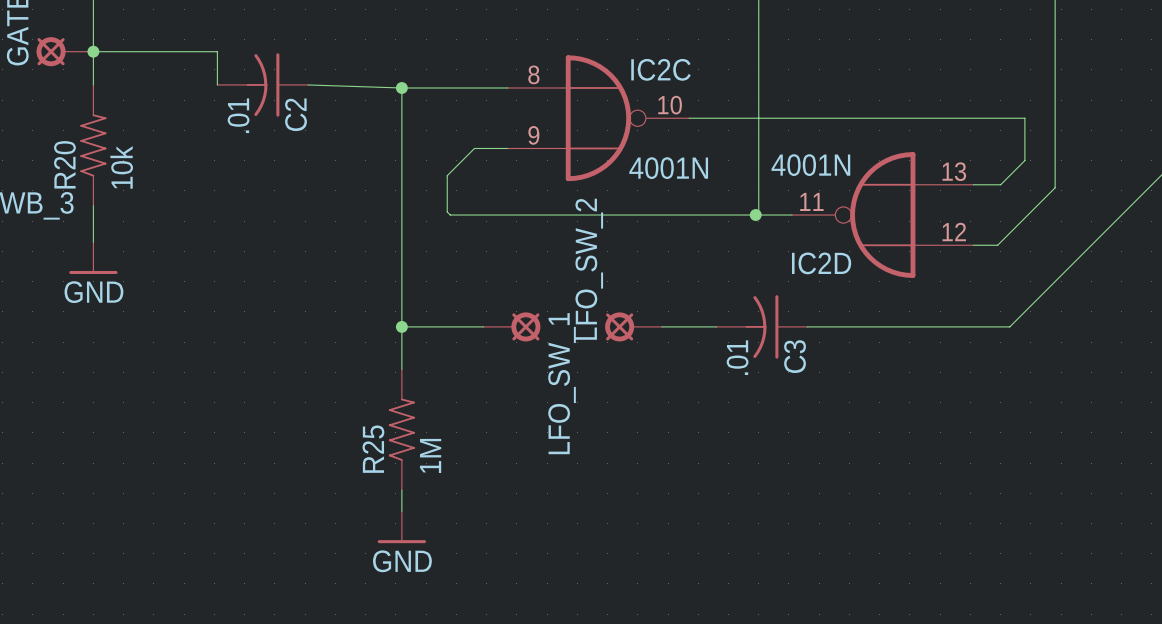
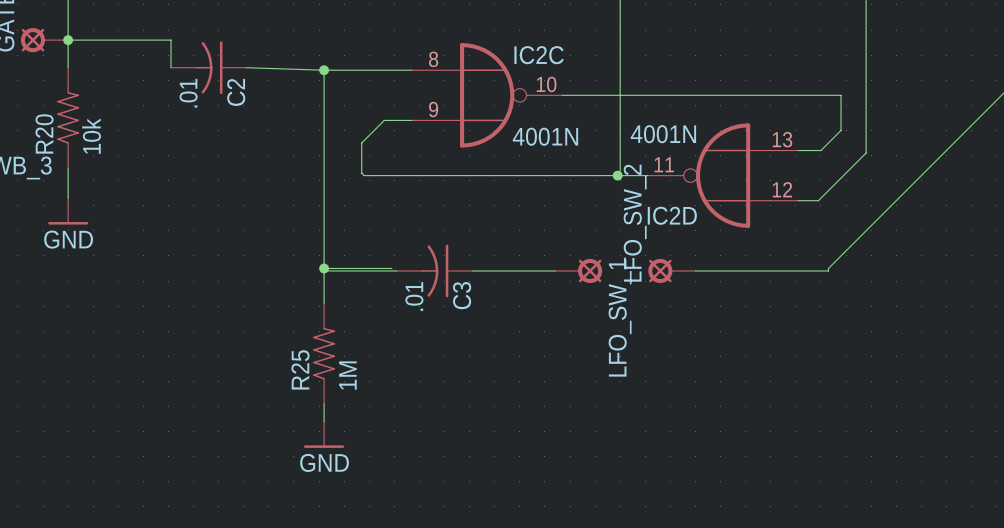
LFO_SW_1 position: (511, 326) -> (578, 270)
LFO_SW_2 position: (633, 326) -> (671, 270)
wire: (661, 326) (716, 326) -> none
C3 position: (761, 326) -> (434, 270)
wire: (807, 326) (1009, 326) -> (695, 270) (828, 270) (828, 268)
wire: none -> (324, 270) (396, 270)
wire: none -> (472, 270) (554, 270)

